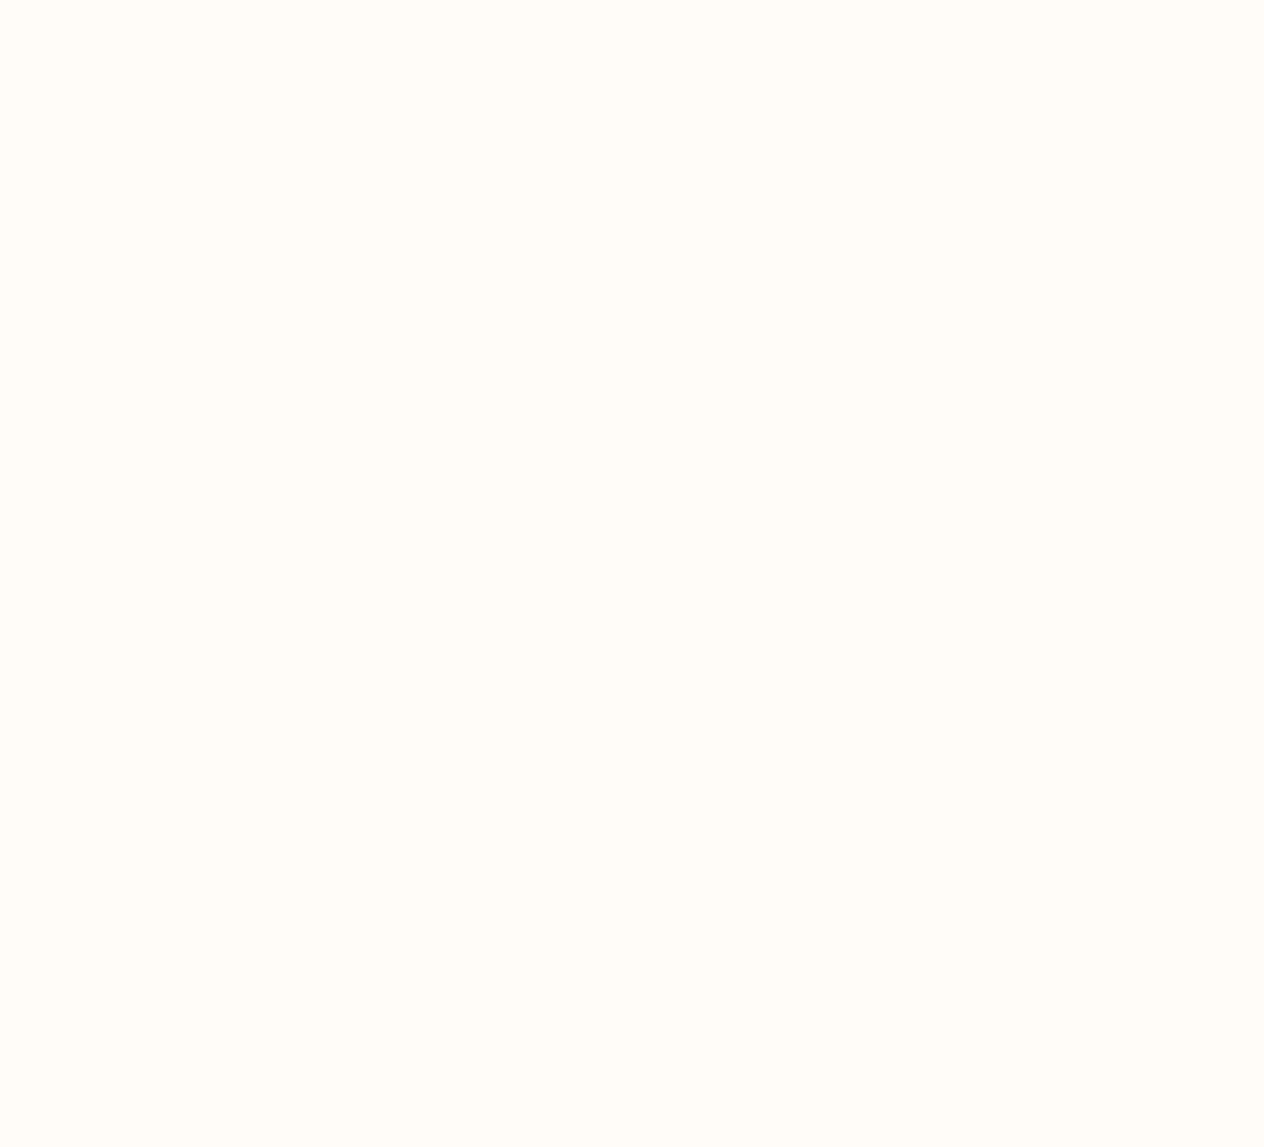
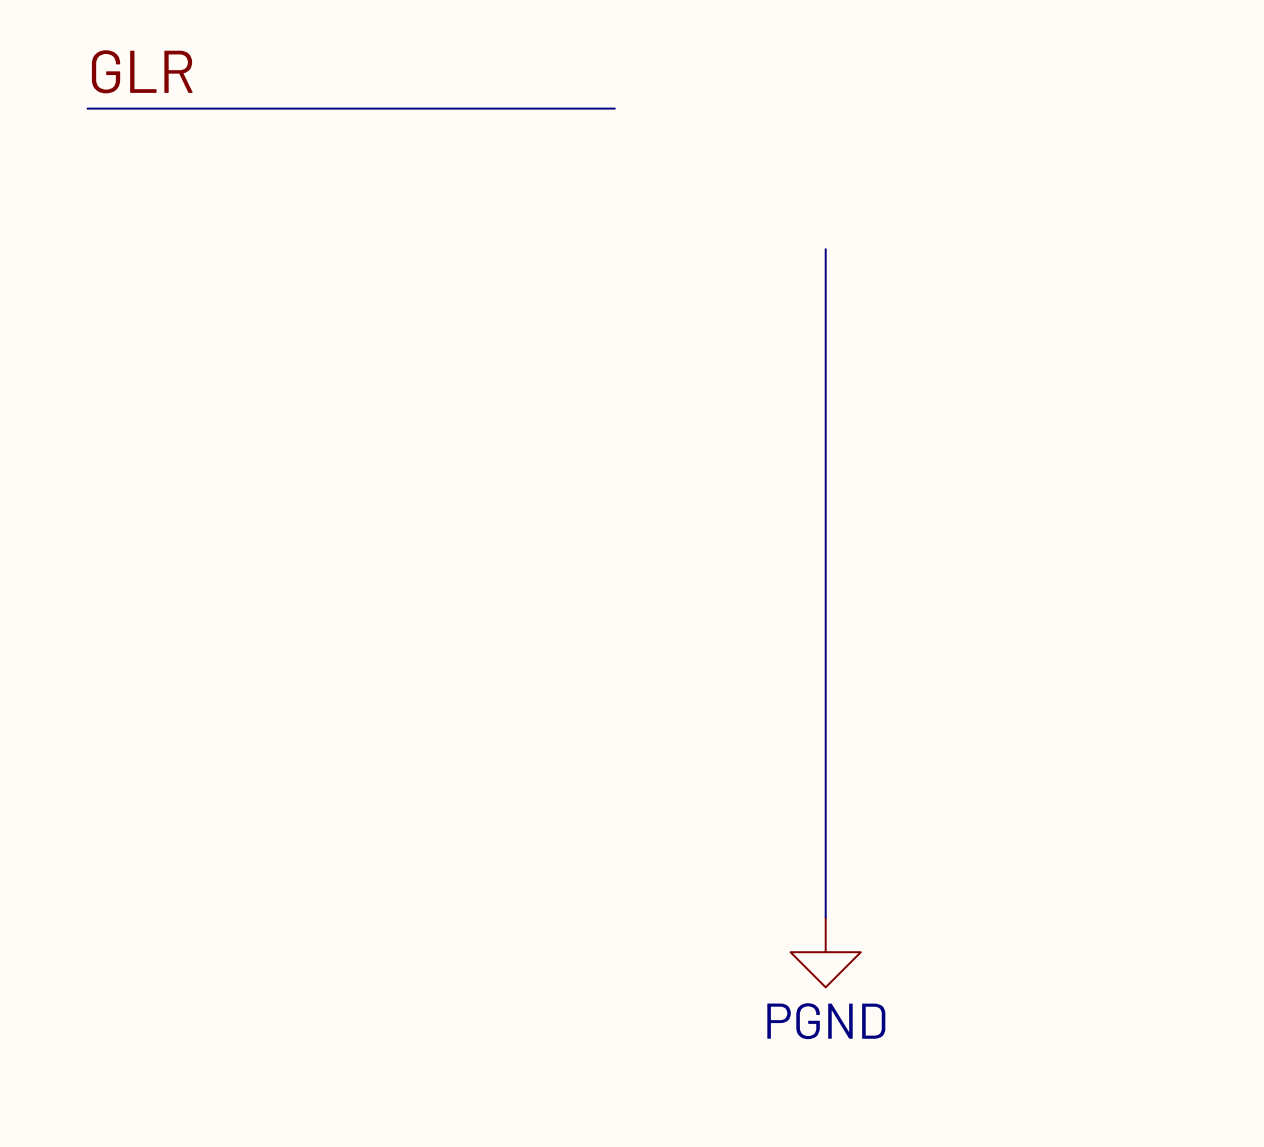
label: none -> GLR (142, 71)
wire: none -> (87, 108) (614, 108)
wire: none -> (825, 249) (825, 917)
power symbol: none -> PGND (825, 952)

